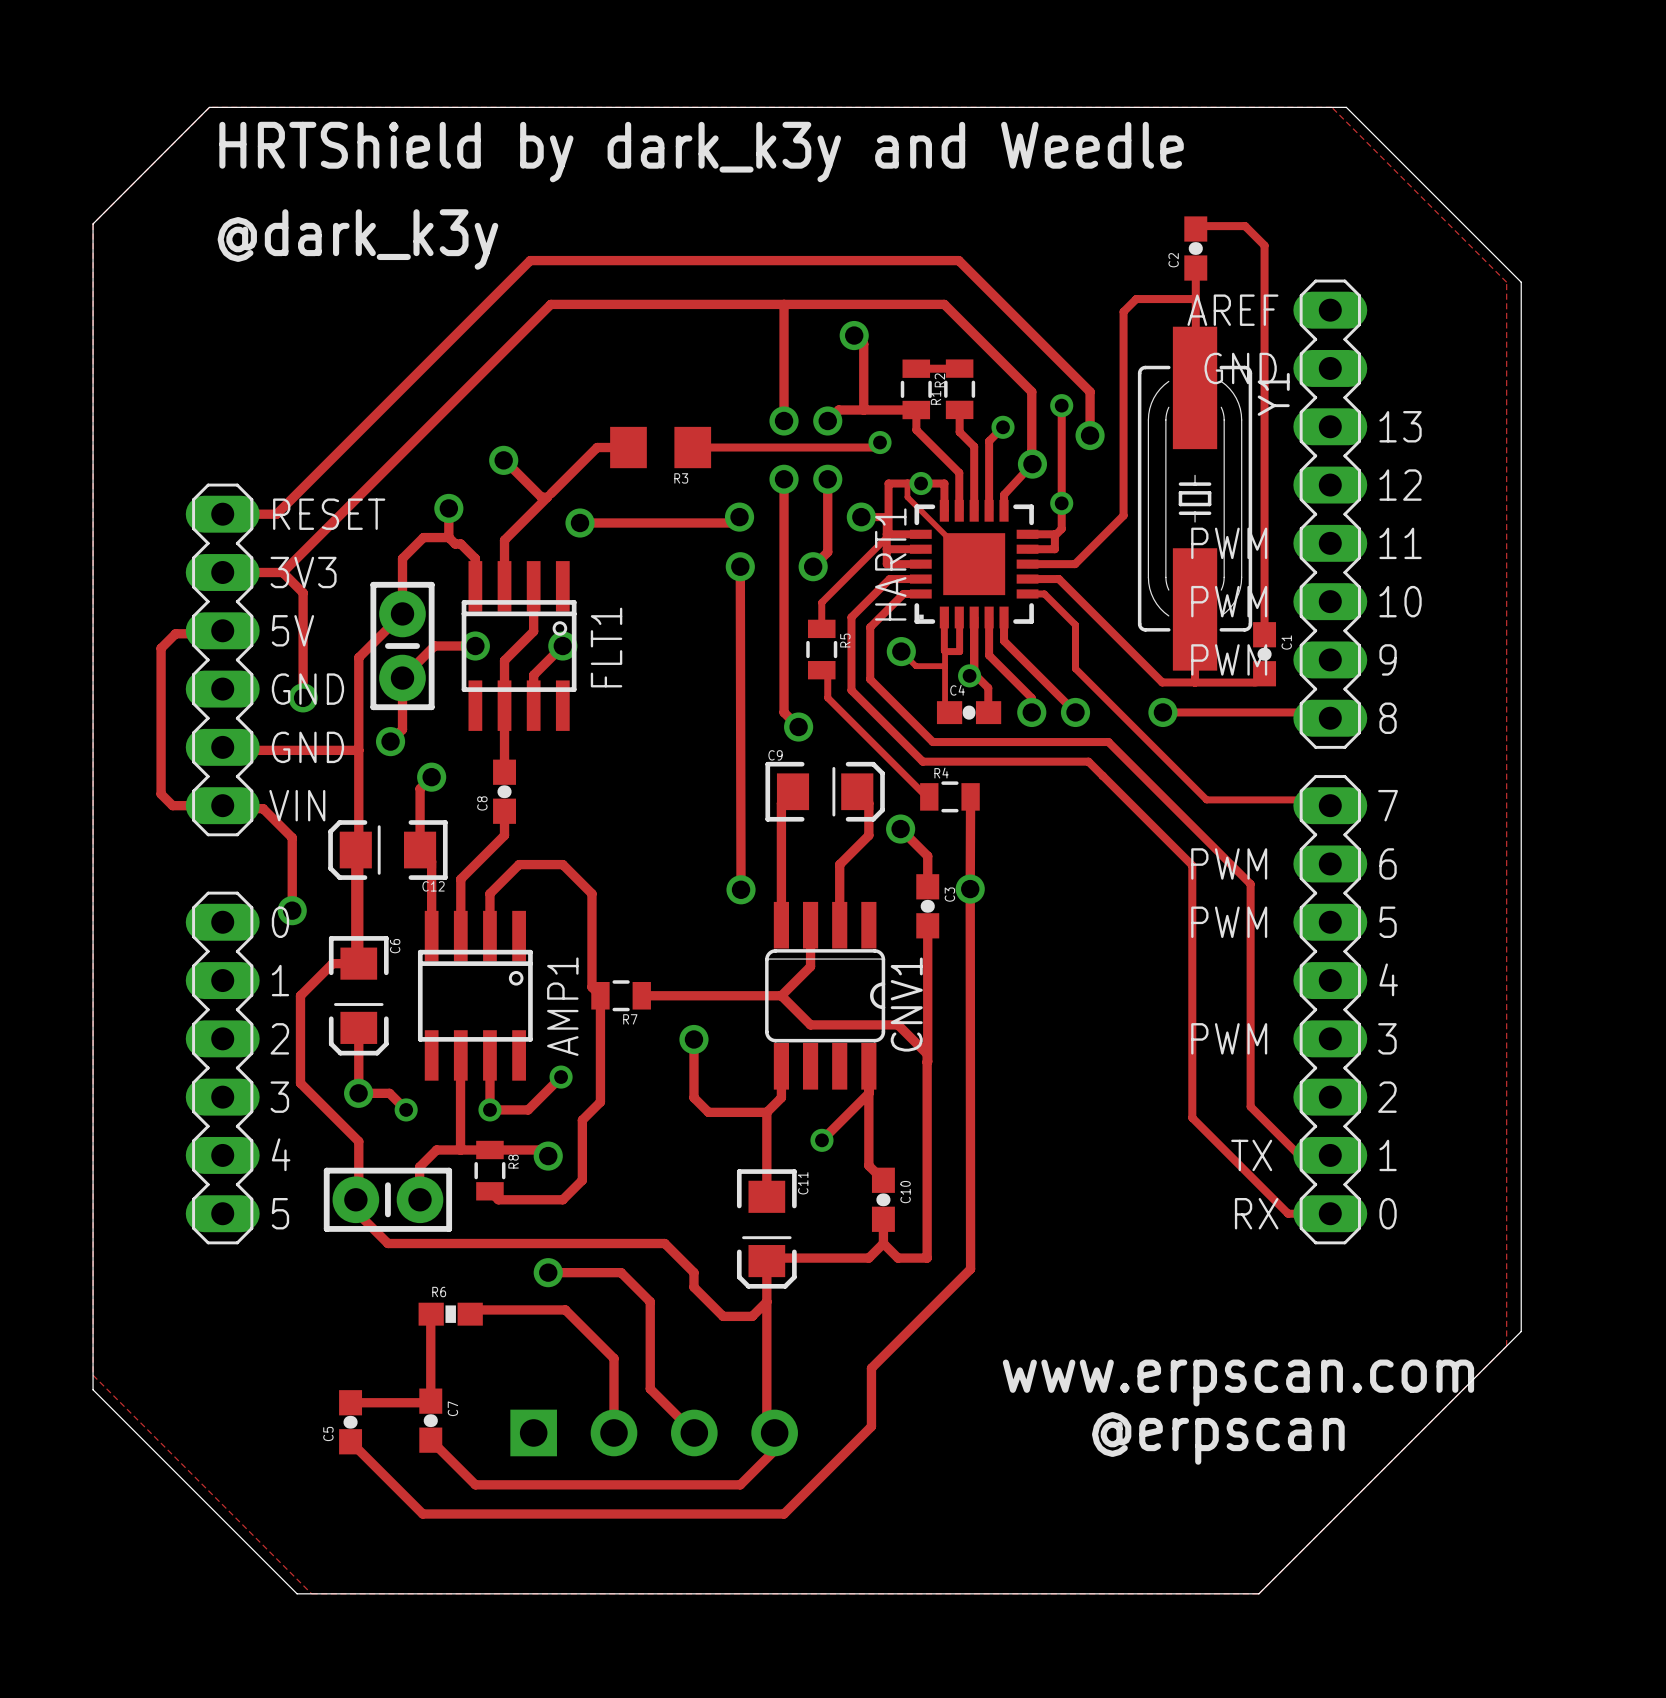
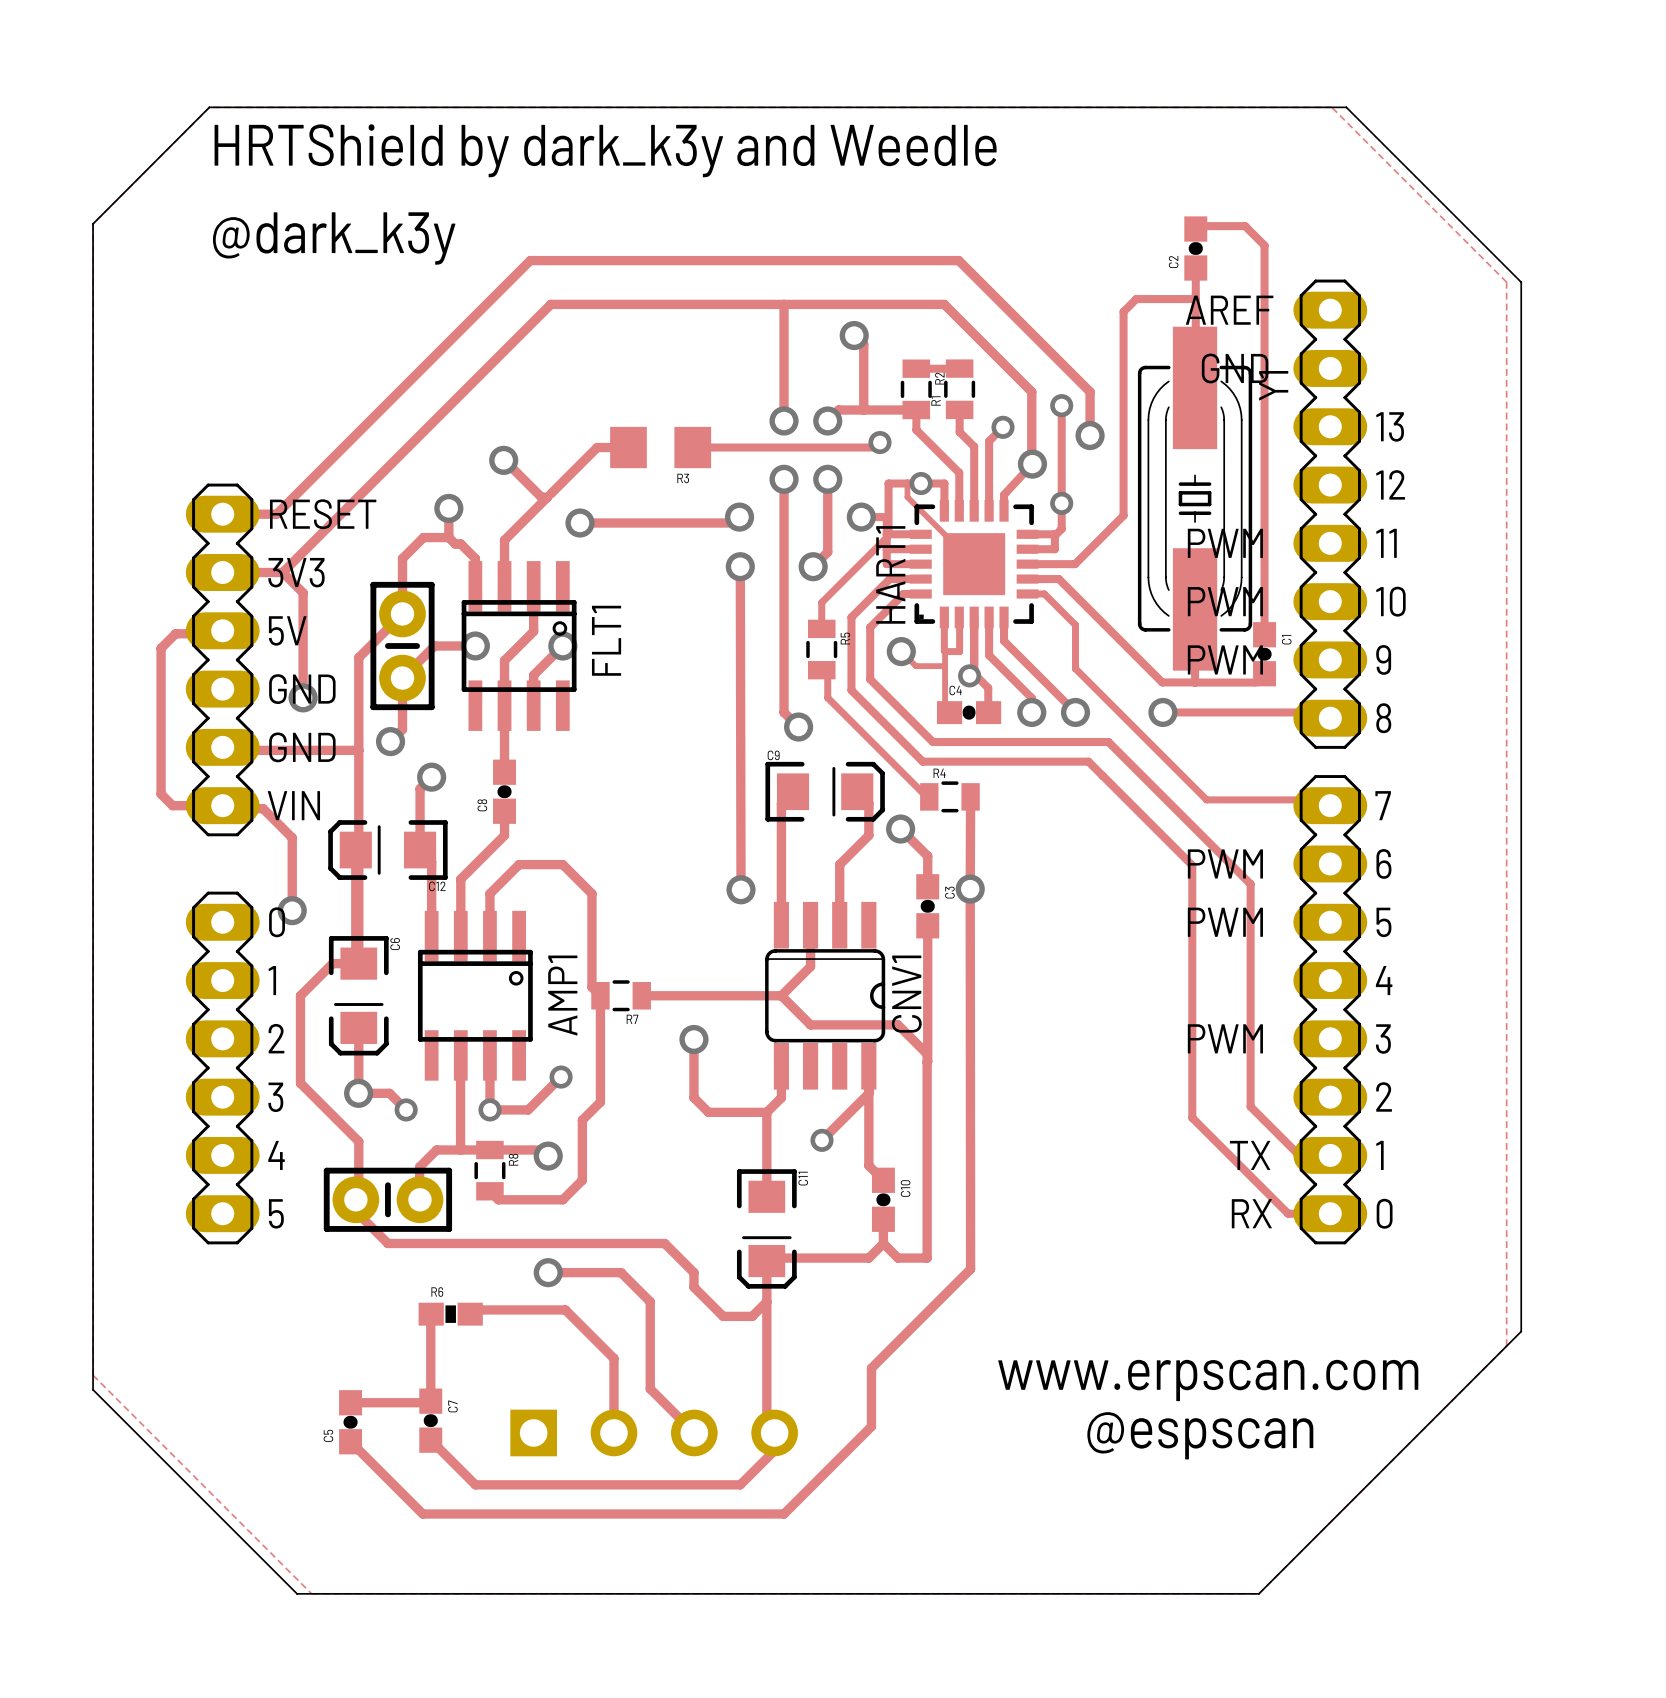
text: @erpscan (1218, 1438) -> @espscan (1200, 1435)

